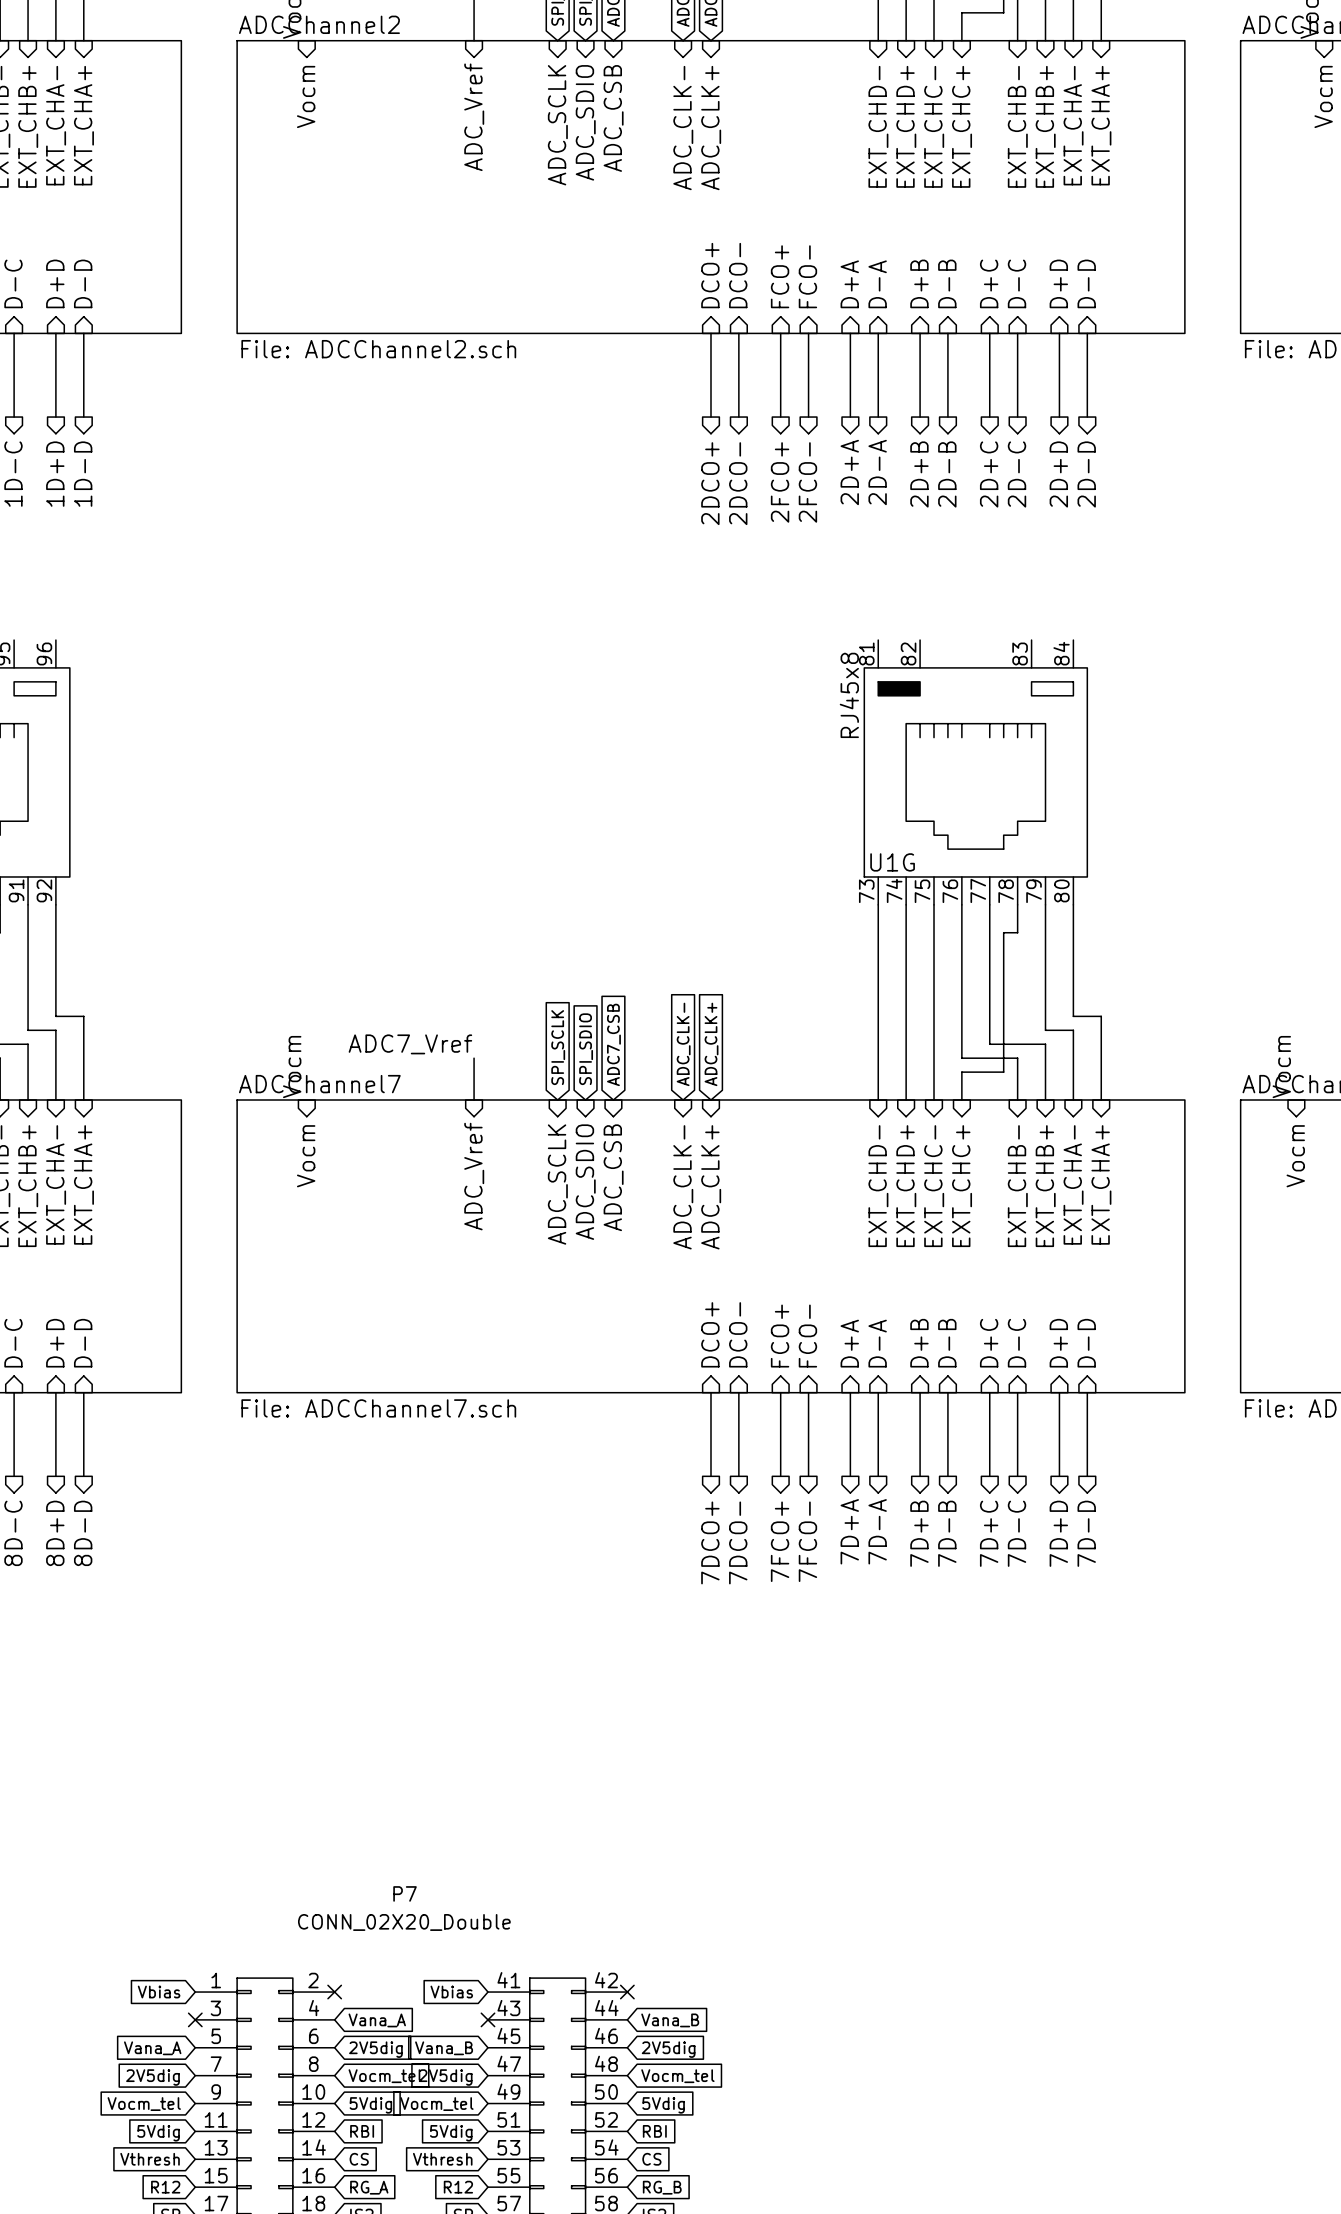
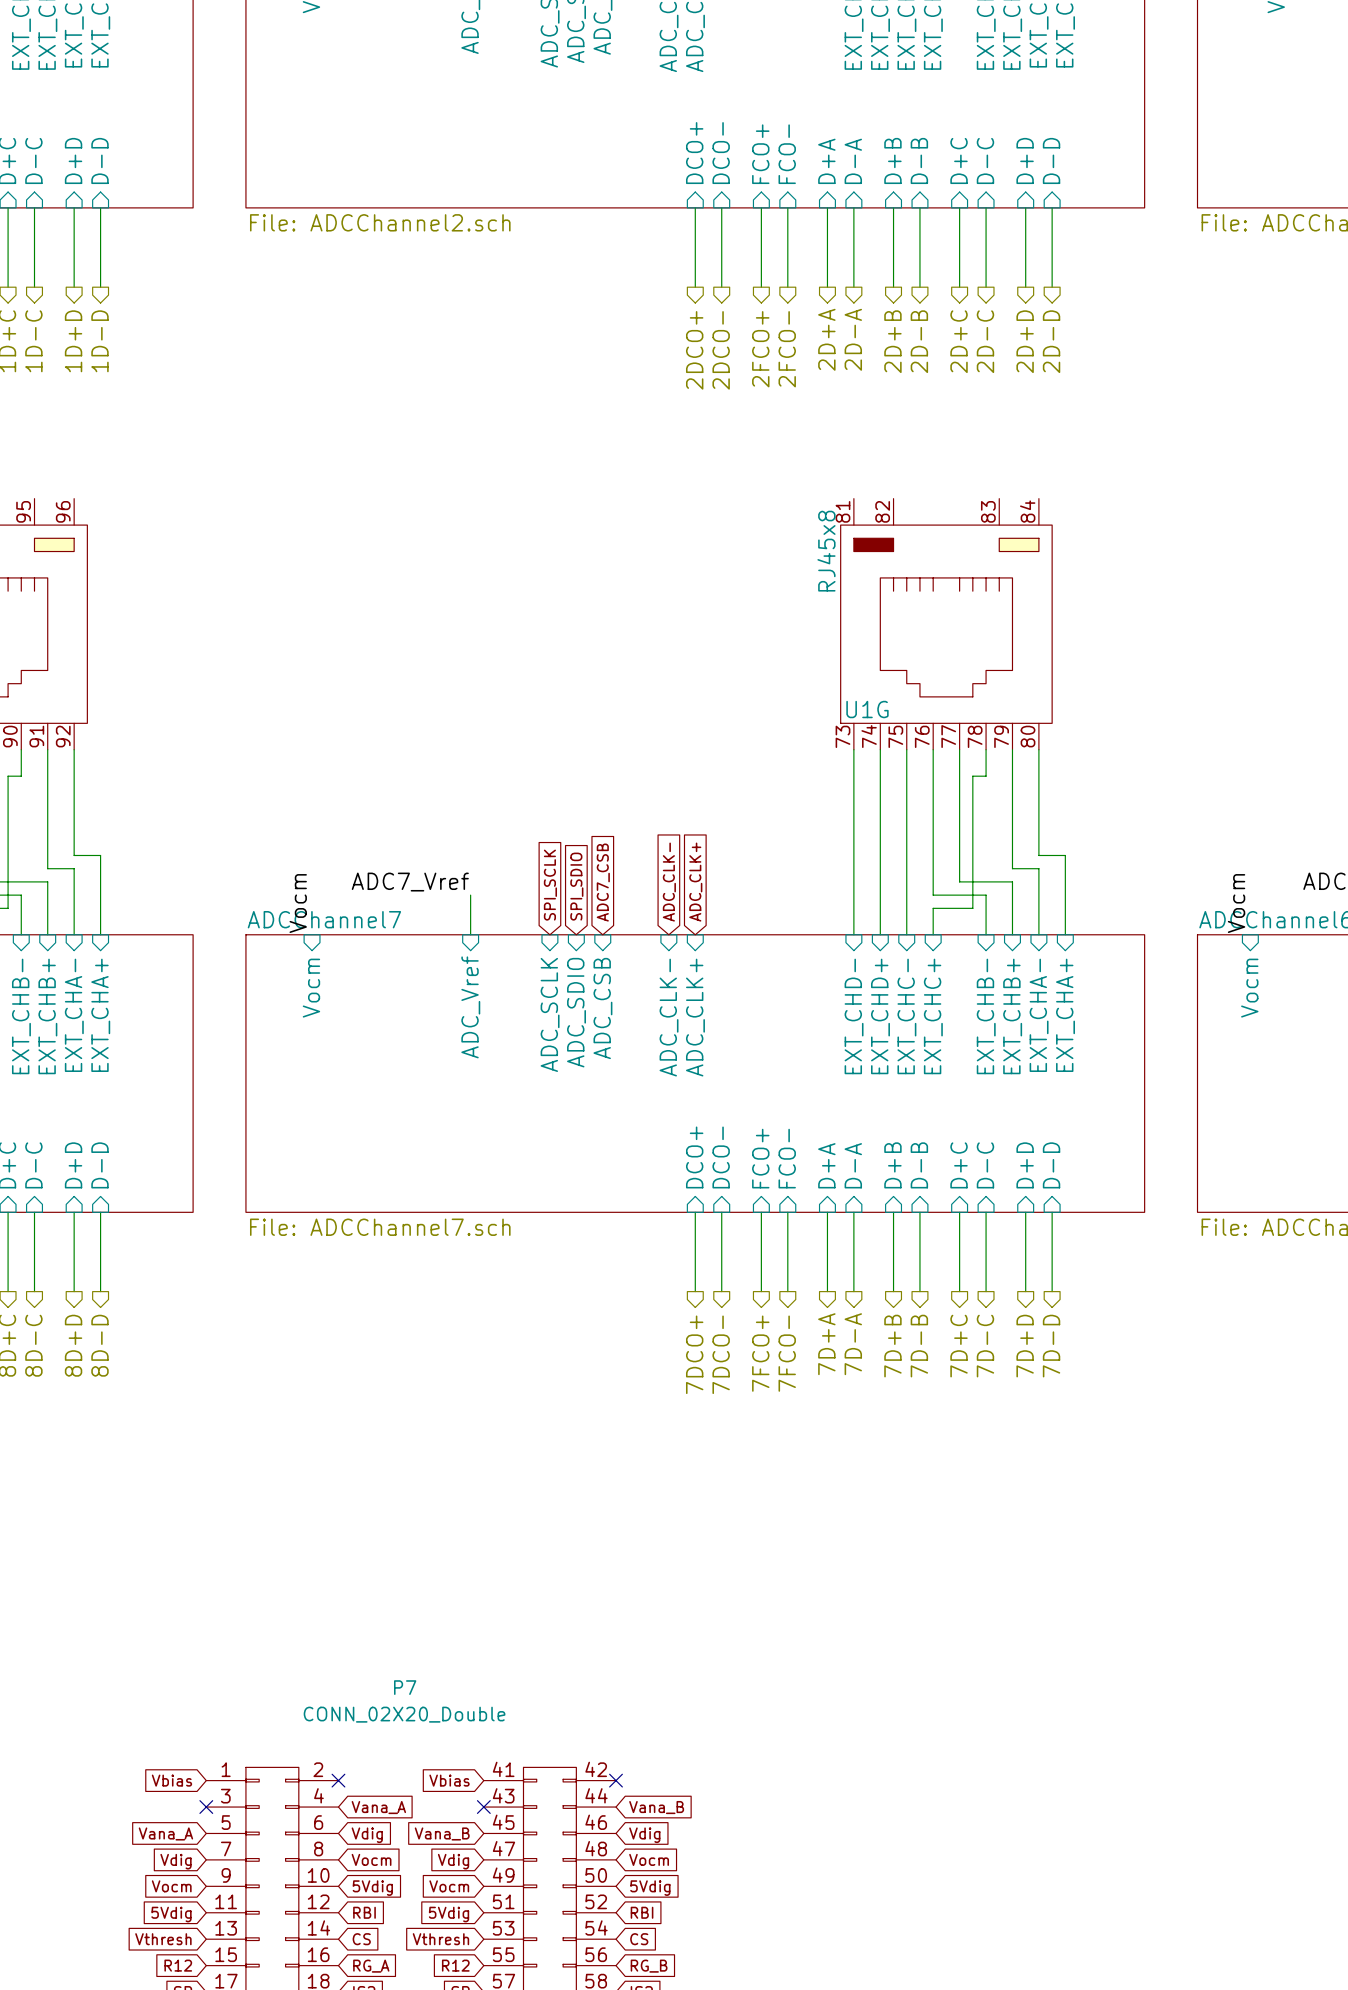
global label: 2V5dig (375, 2049) -> Vdig (367, 1835)
global label: 2V5dig (668, 2049) -> Vdig (644, 1835)
global label: Vocm_tel (385, 2076) -> Vocm (371, 1859)
global label: Vocm_tel (677, 2076) -> Vocm (649, 1859)
global label: 2V5dig (152, 2077) -> Vdig (176, 1861)
global label: 2V5dig (445, 2077) -> Vdig (453, 1861)
global label: Vocm_tel (144, 2104) -> Vocm (171, 1886)
global label: Vocm_tel (436, 2104) -> Vocm (449, 1886)

